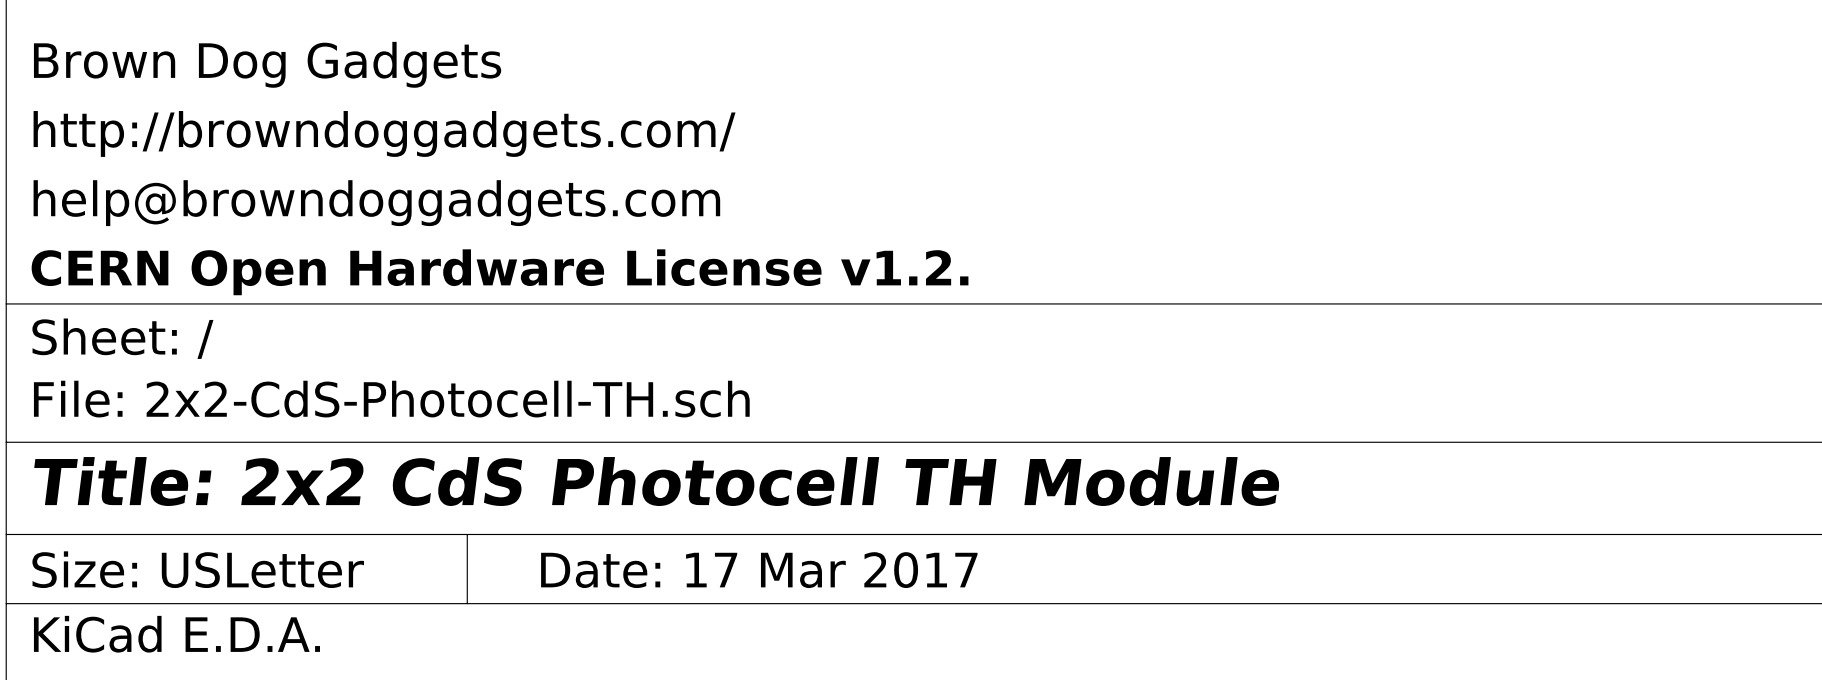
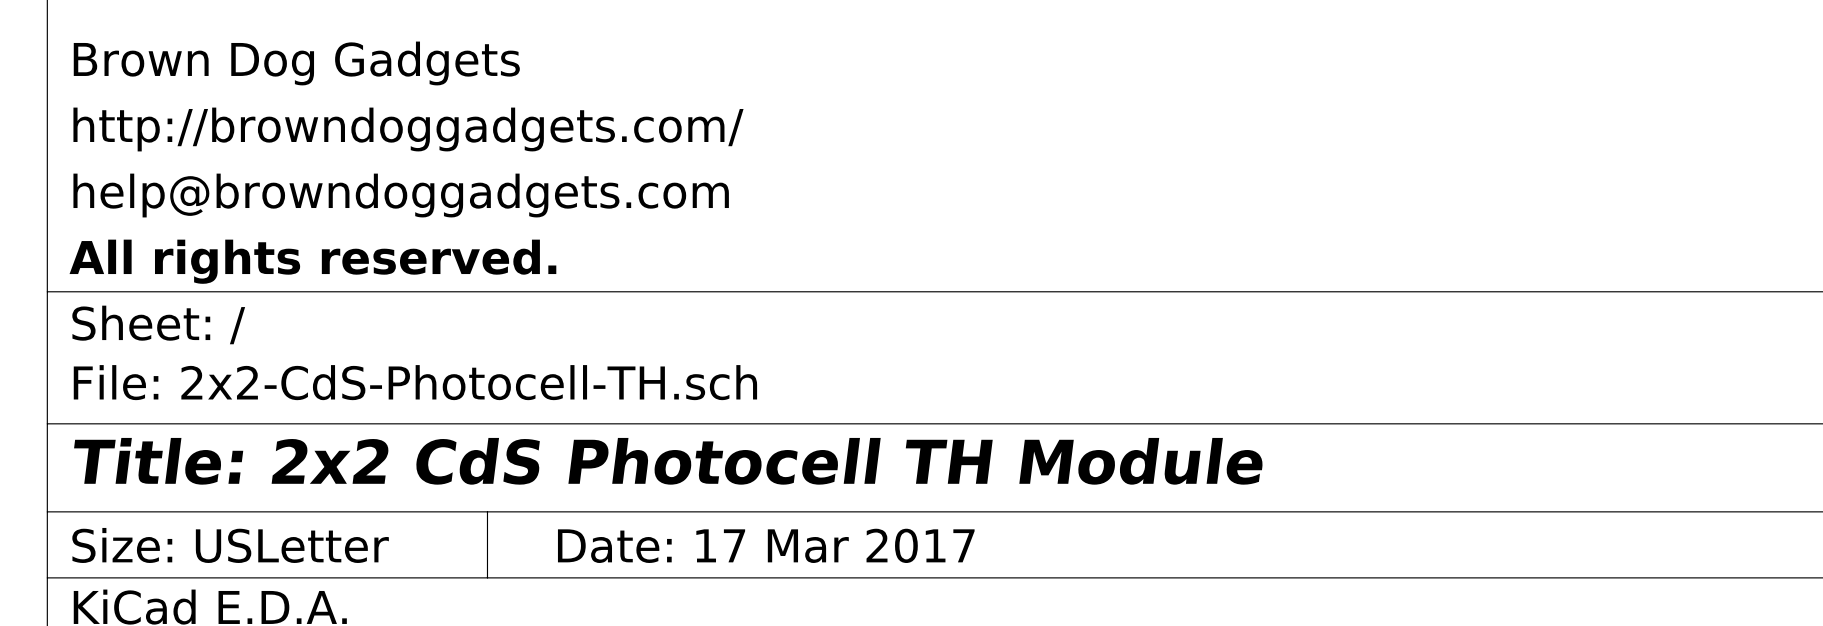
title block: CERN Open Hardware License v1.2. (500, 272) -> All rights reserved. (312, 261)

